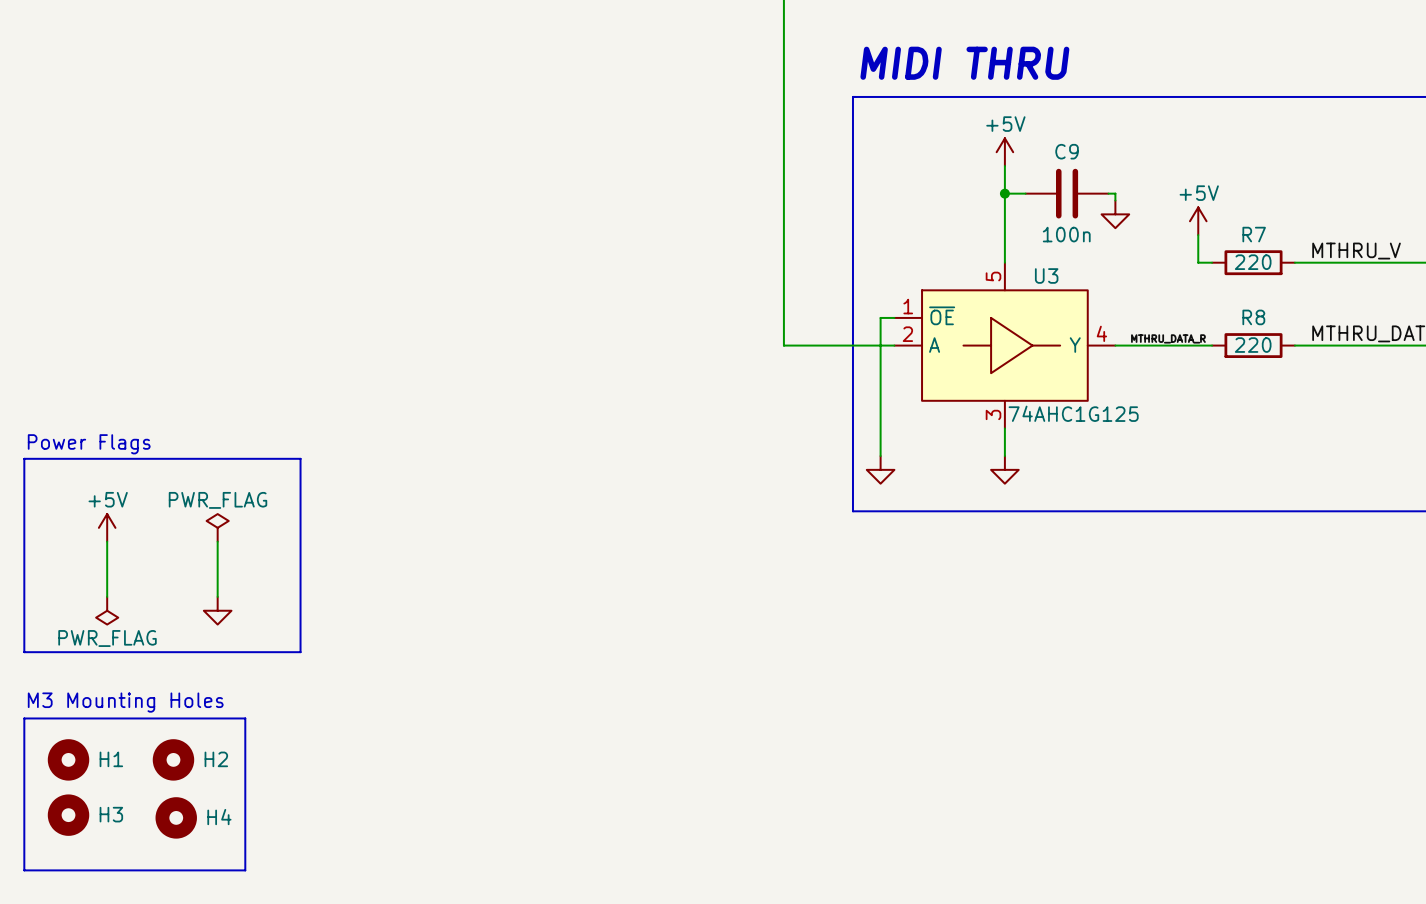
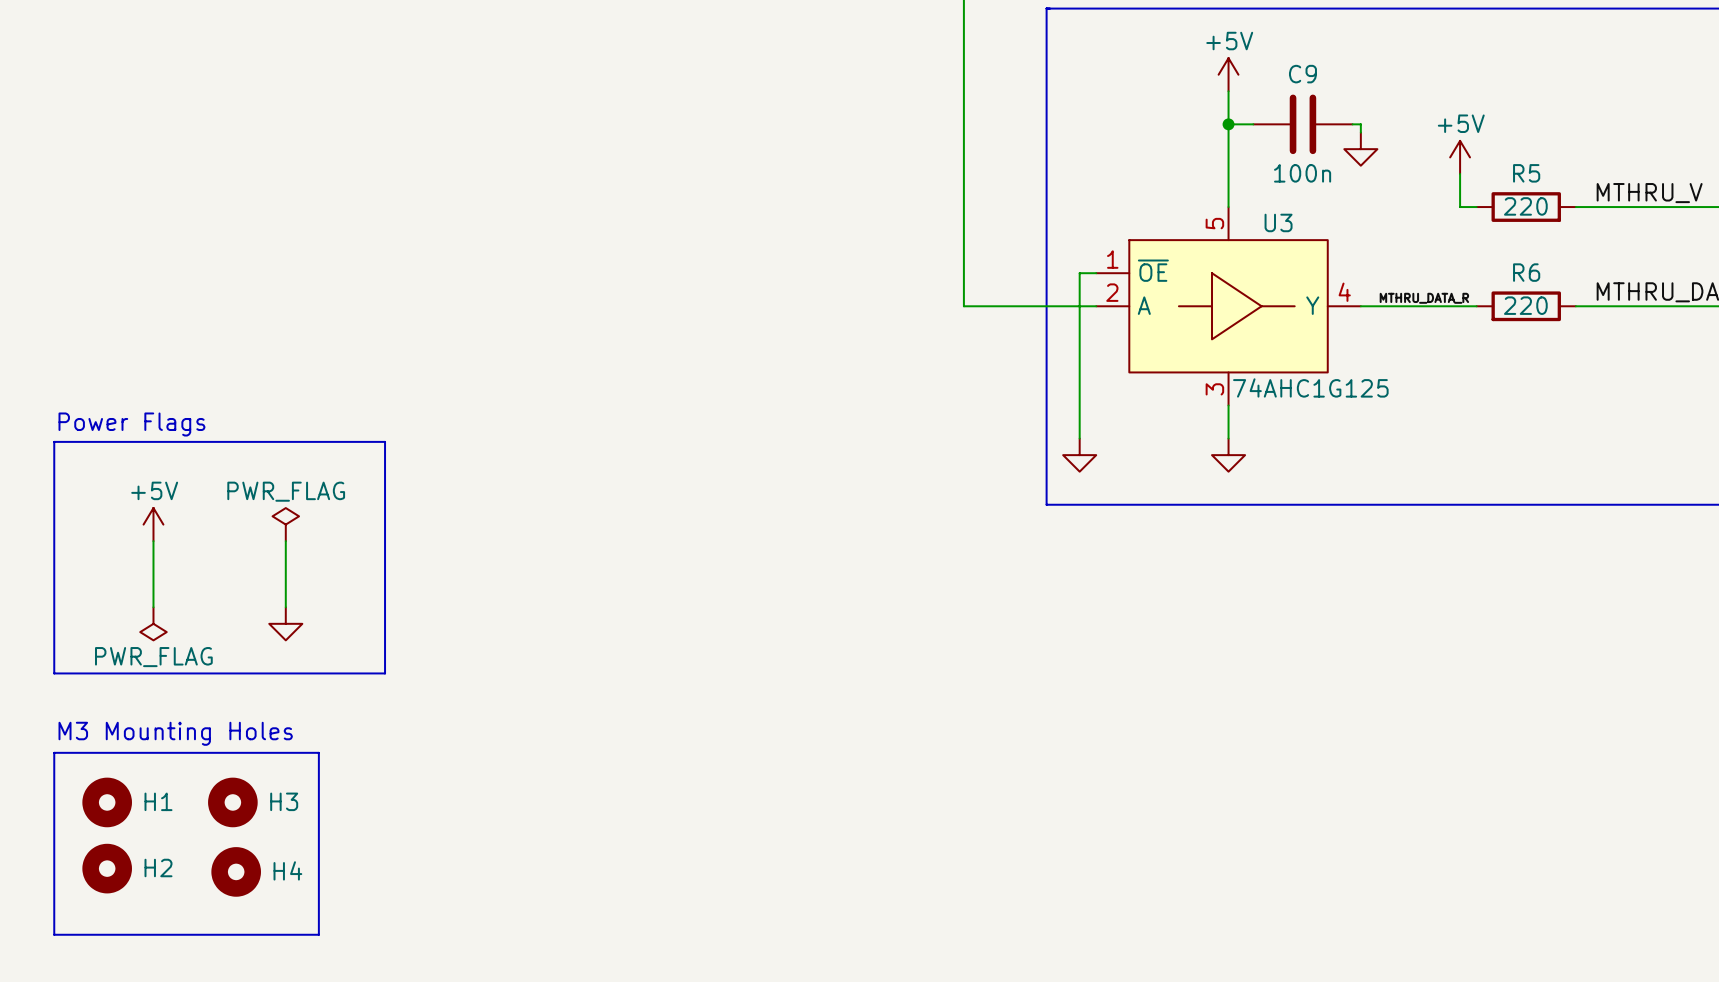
R7 name: R7 (1254, 234) -> R5 (1526, 173)
R8 name: R8 (1253, 317) -> R6 (1526, 272)
H2 name: H2 (216, 759) -> H3 (284, 801)
H3 name: H3 (111, 814) -> H2 (158, 867)

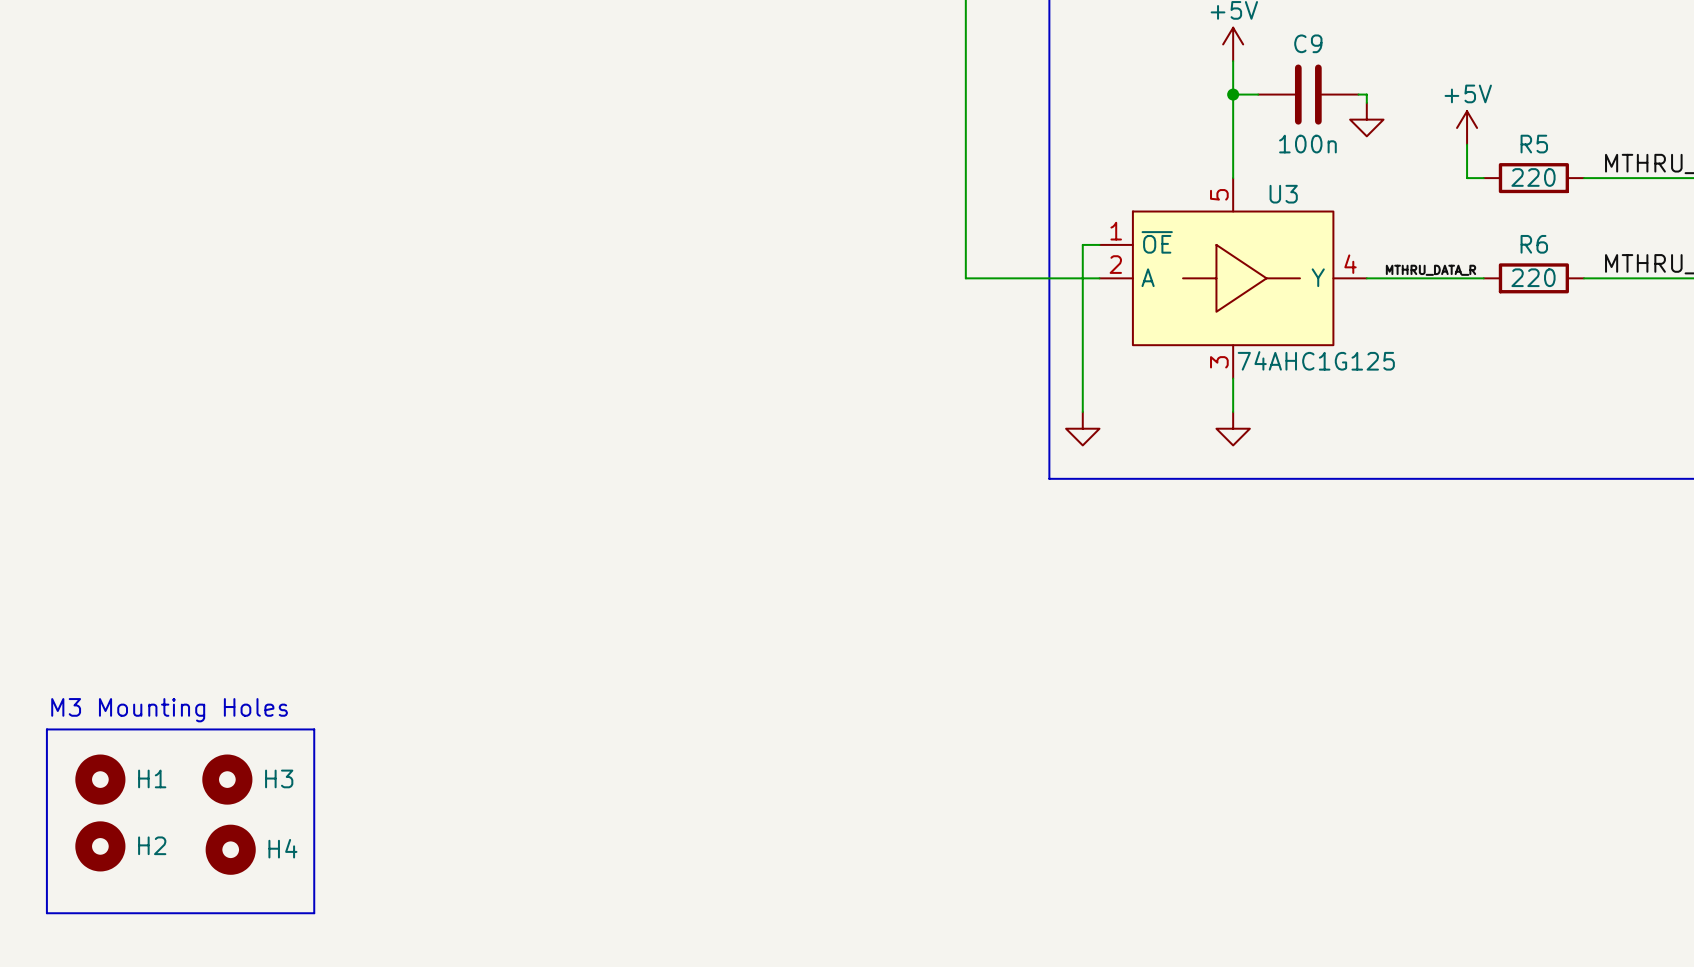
text: Power Flags (131, 424) -> none
line: (54, 441) (54, 673) (385, 673) (385, 441) (54, 441) -> none
power symbol: +5V (153, 524) -> none
power symbol: PWR_FLAG (285, 524) -> none
wire: (153, 541) (153, 607) -> none
wire: (285, 541) (285, 607) -> none
power symbol: PWR_FLAG (153, 623) -> none
power symbol: (285, 623) -> none

